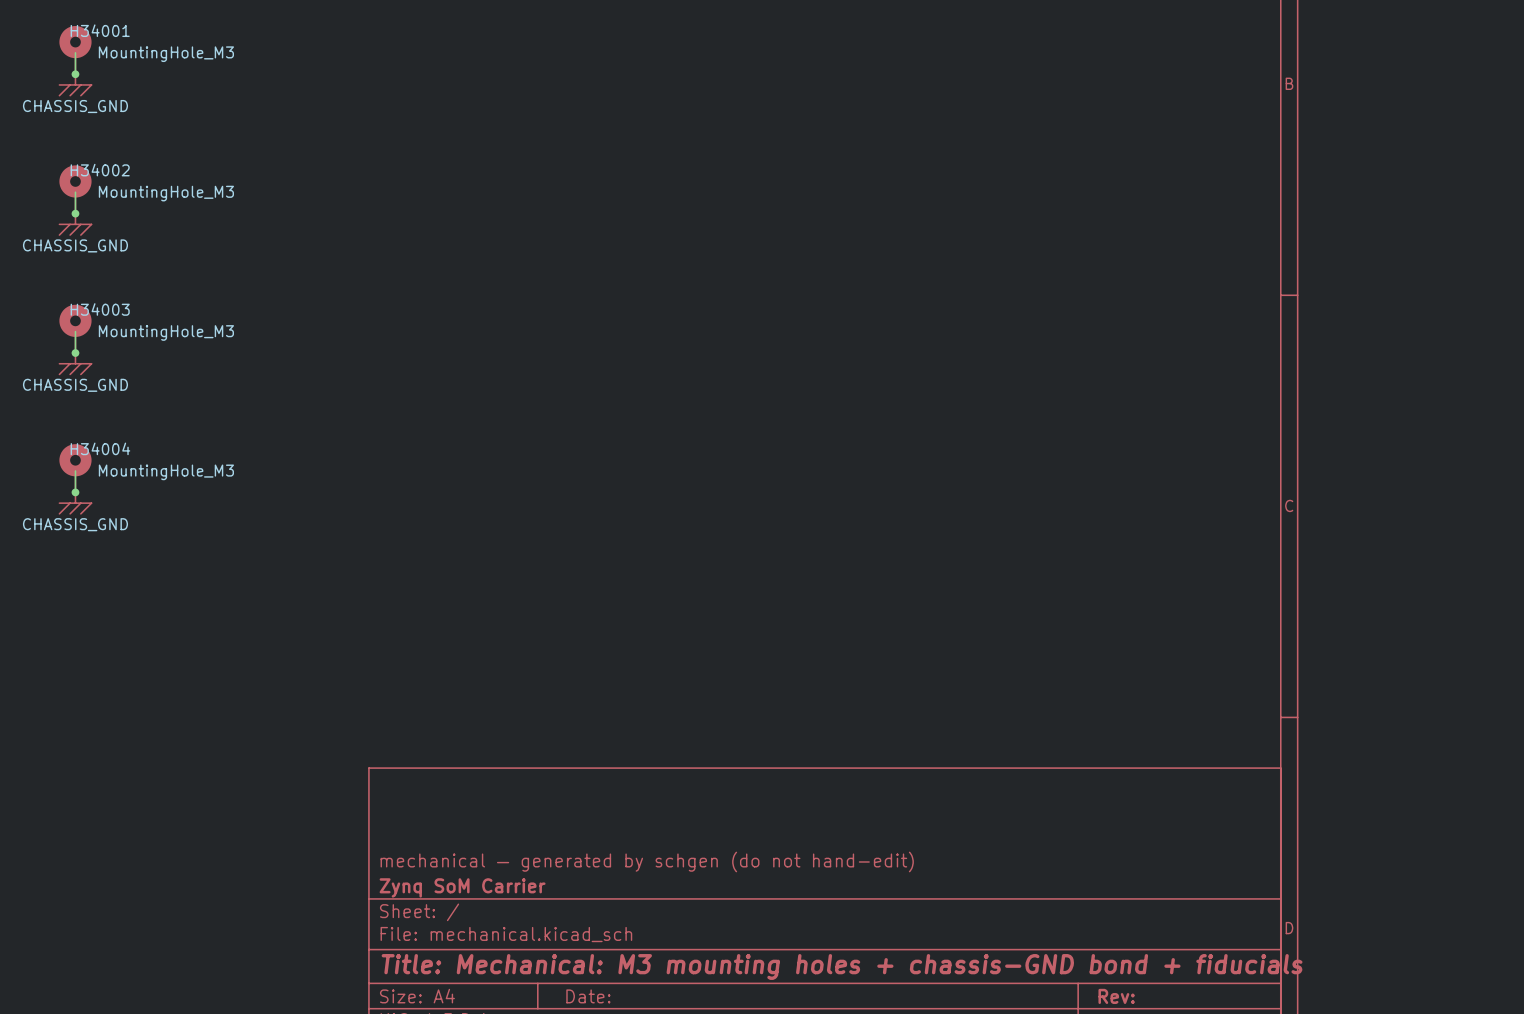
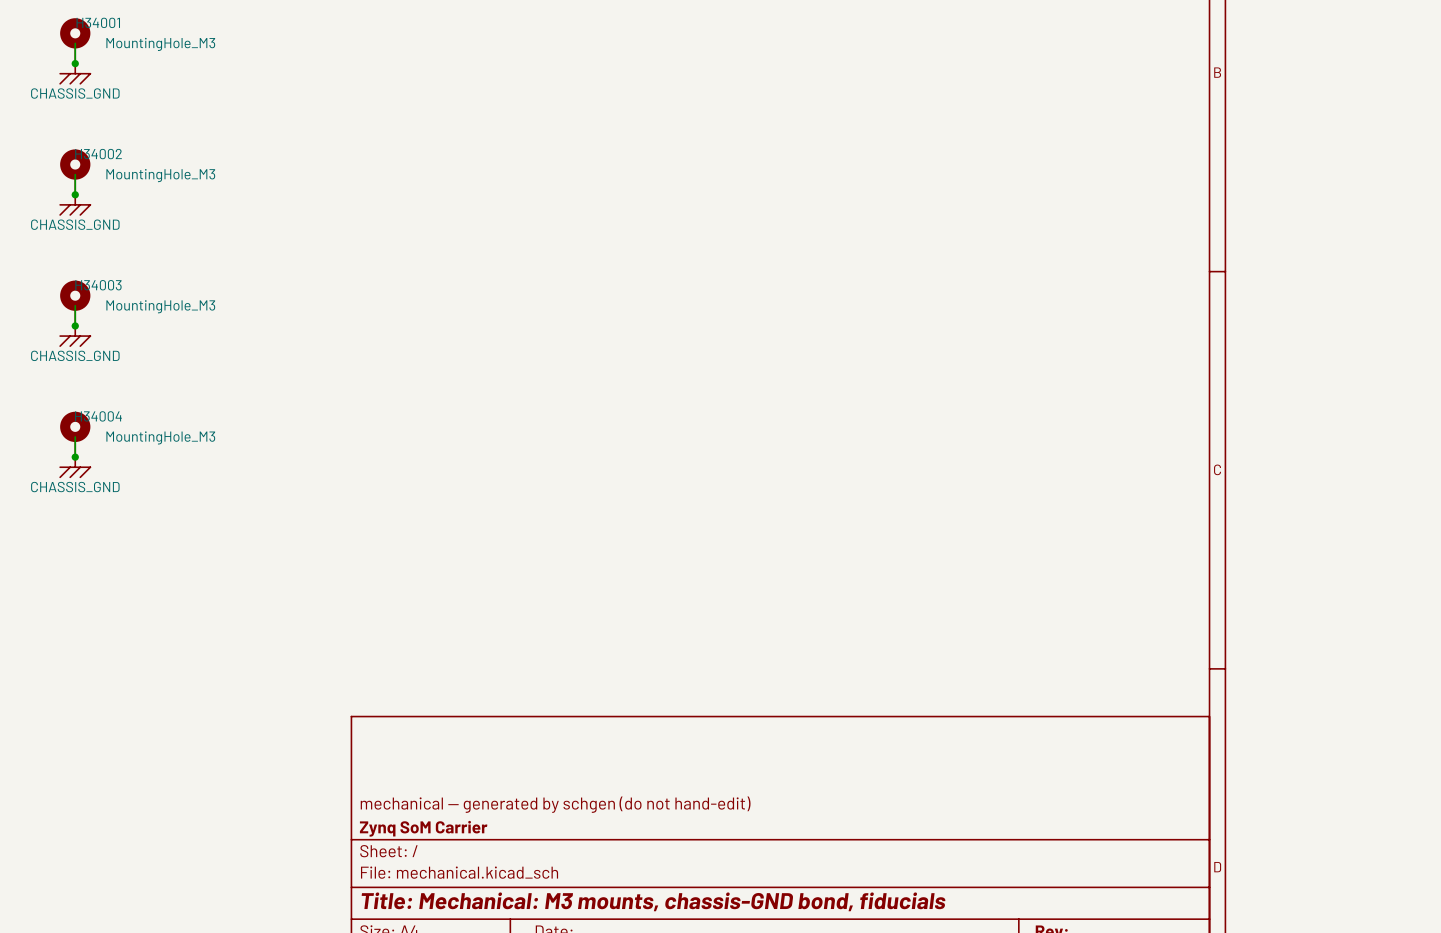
title block: Title: Mechanical: M3 mounting holes + chassis-GND bond + fiducials (842, 966) -> Title: Mechanical: M3 mounts, chassis-GND bond, fiducials (653, 901)

